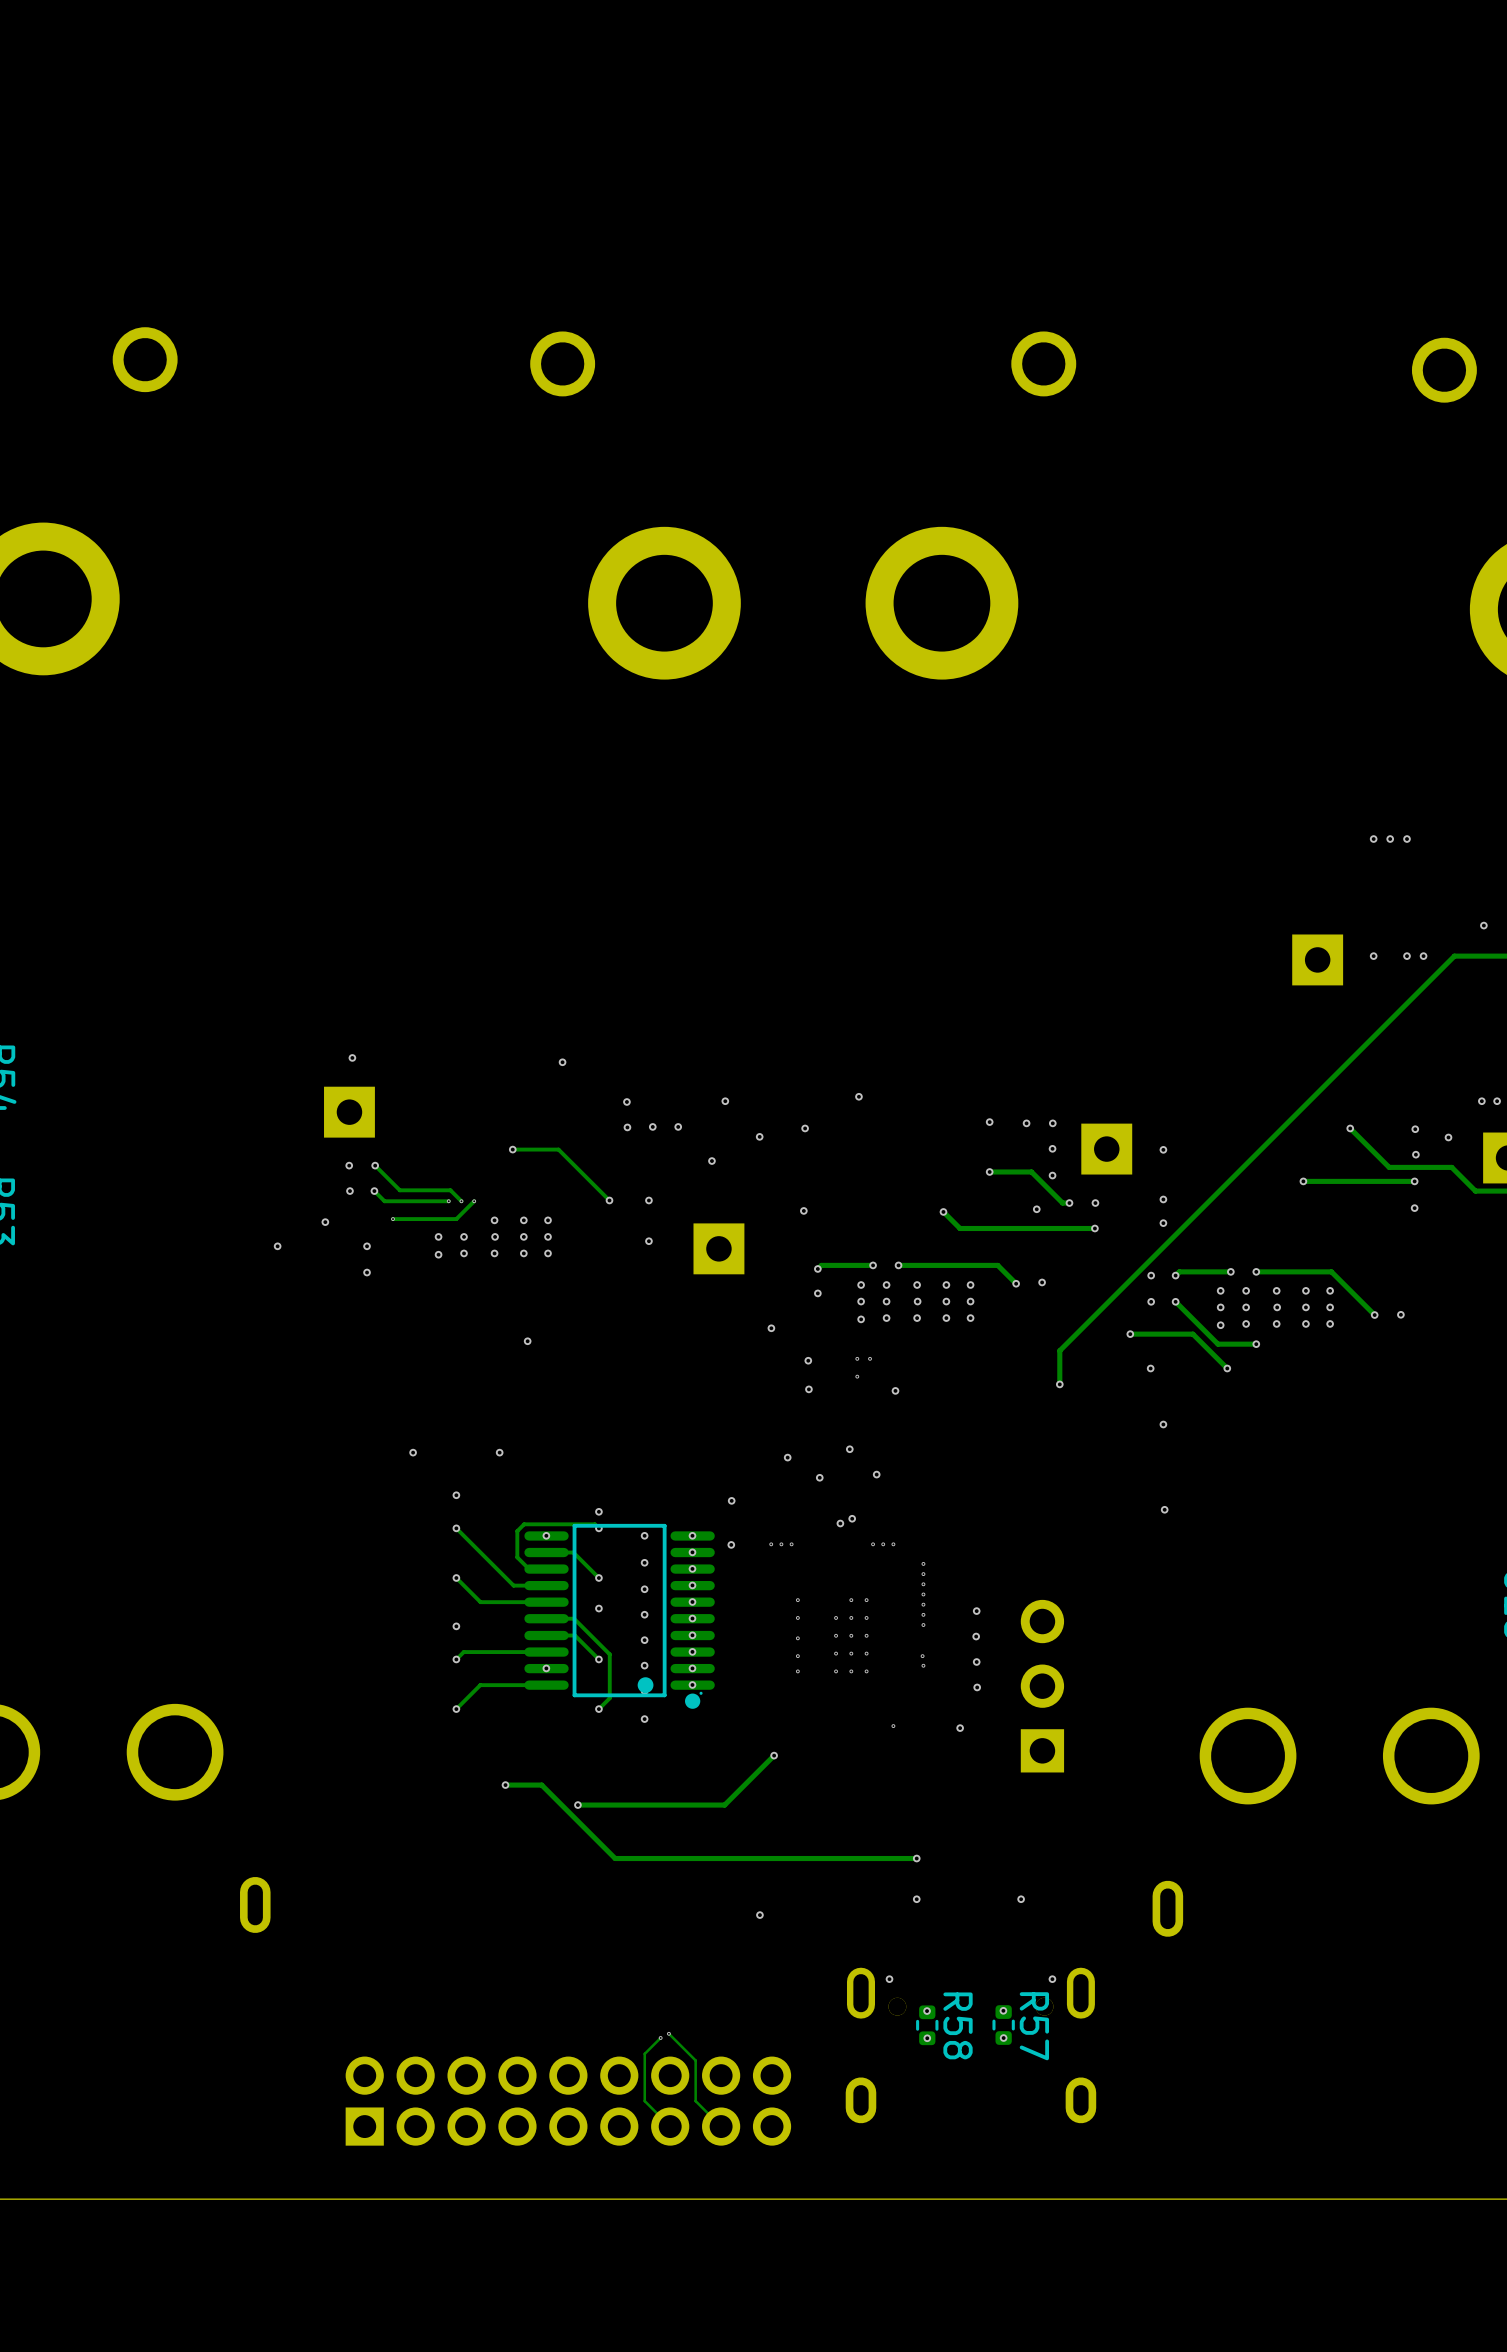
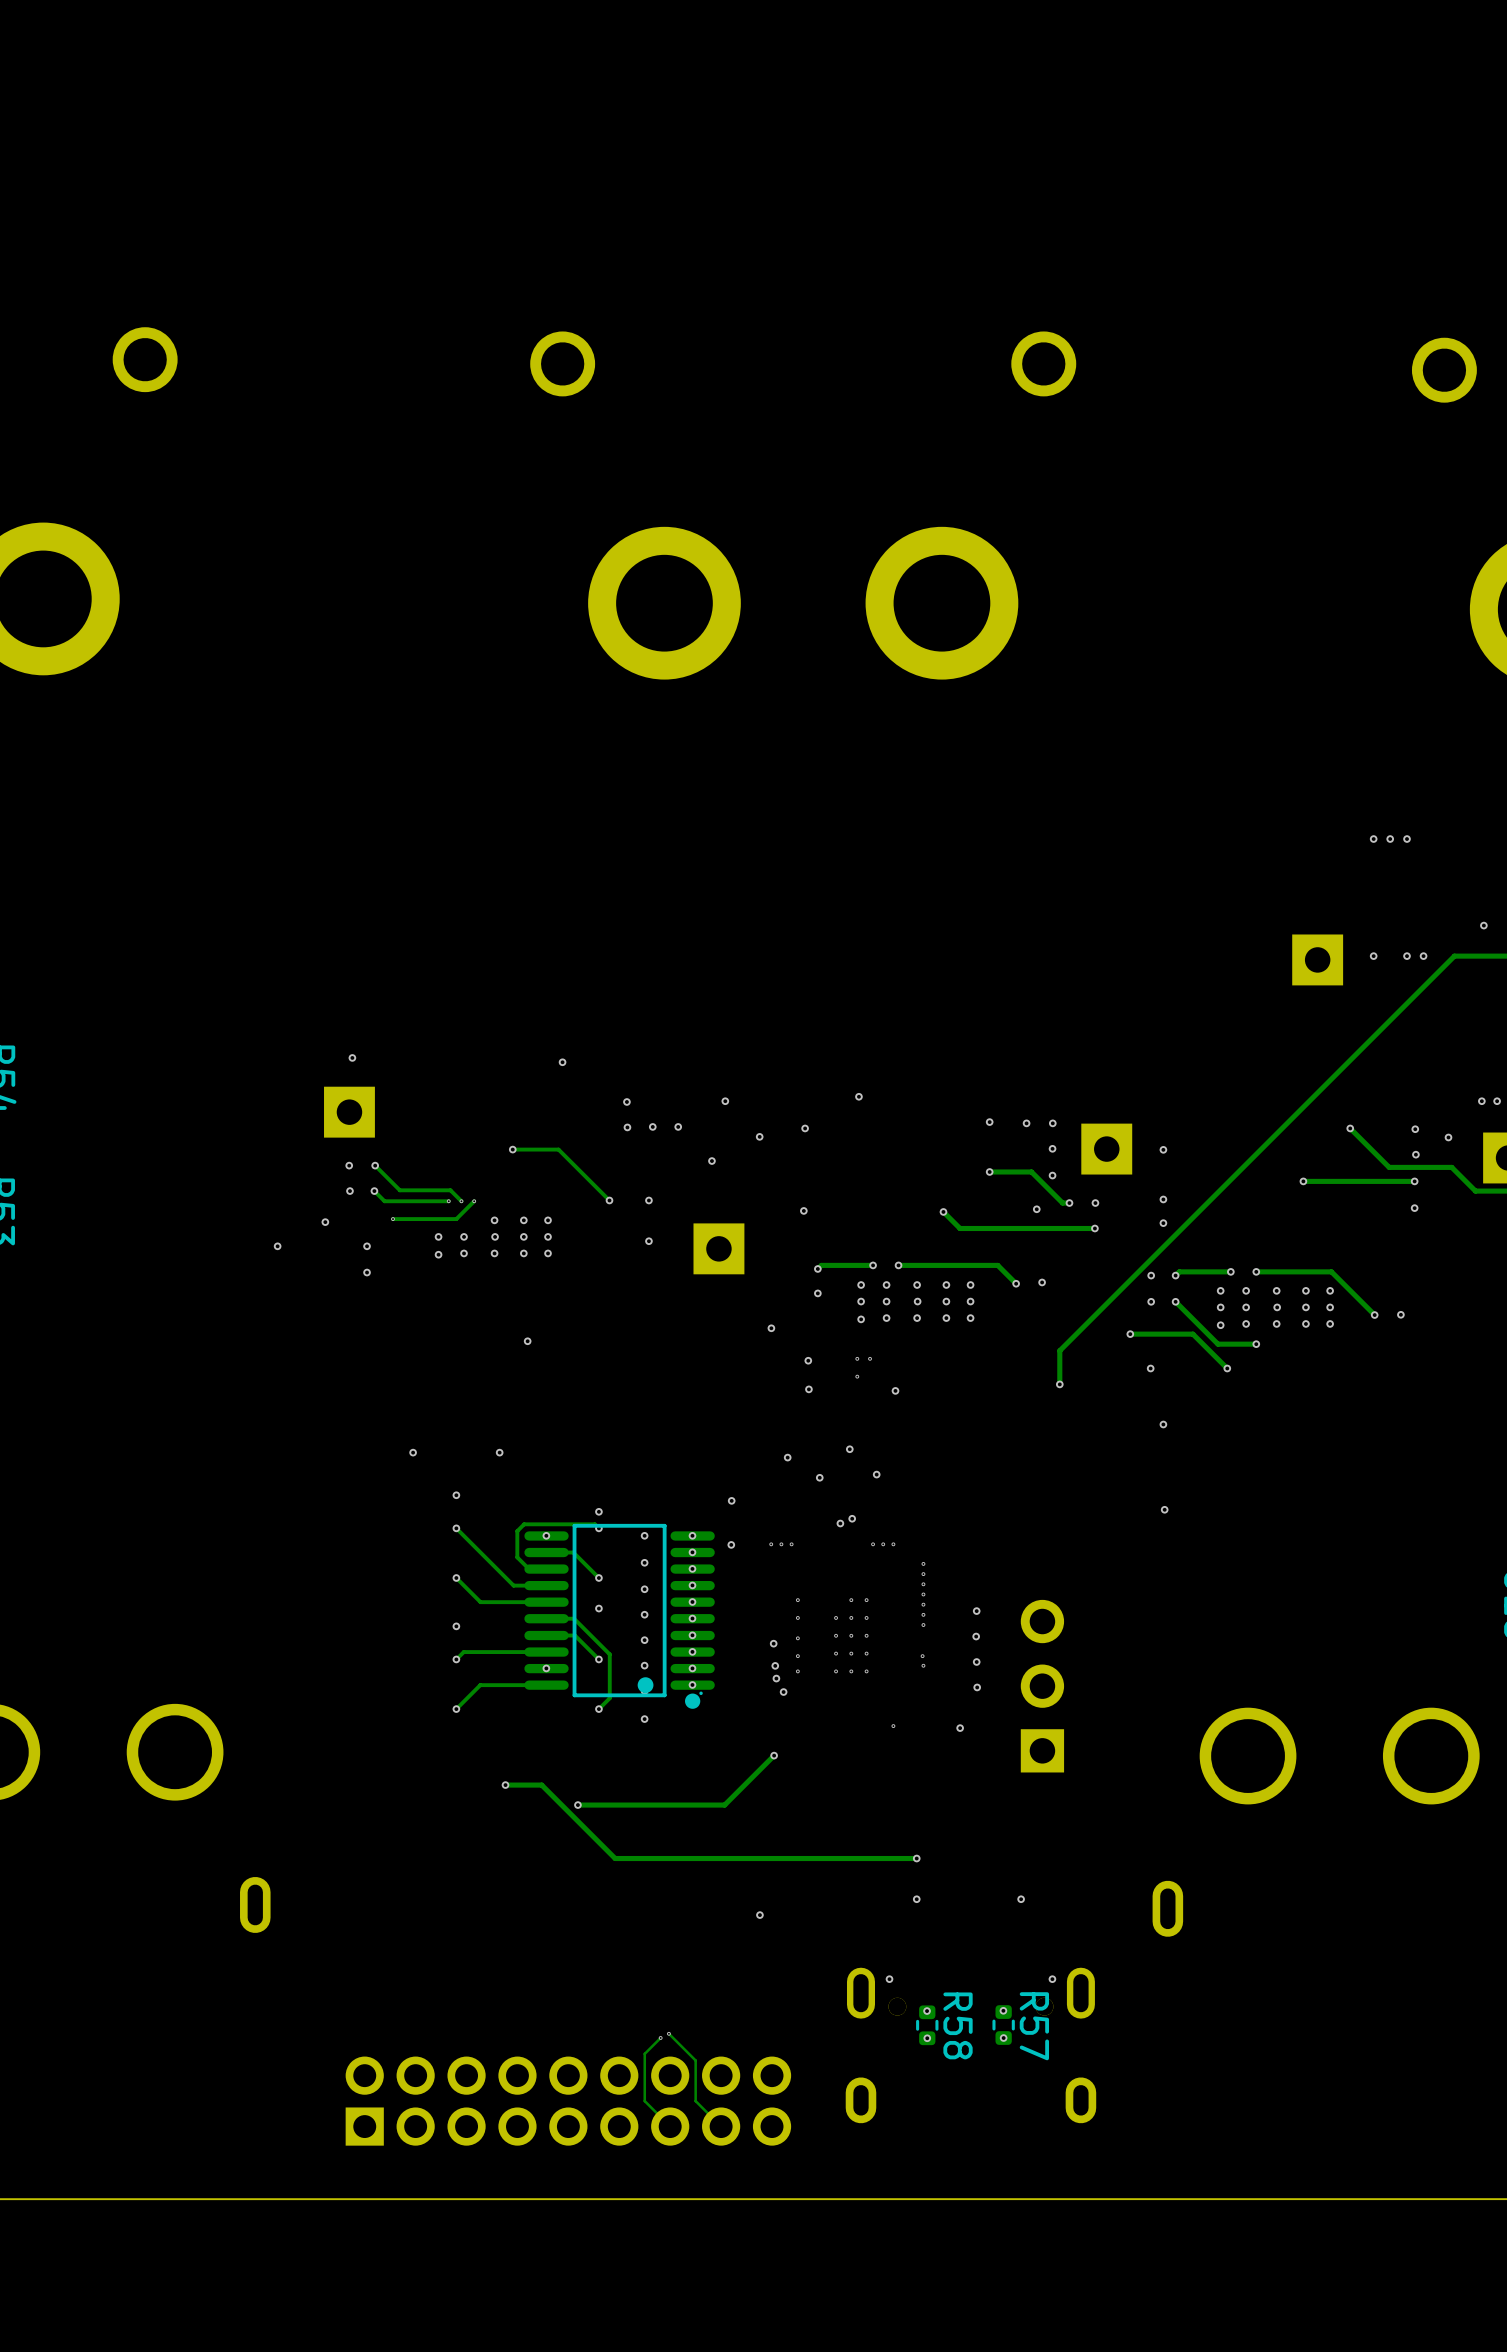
via: none -> (773, 1643)
via: none -> (775, 1665)
via: none -> (776, 1678)
via: none -> (783, 1692)

